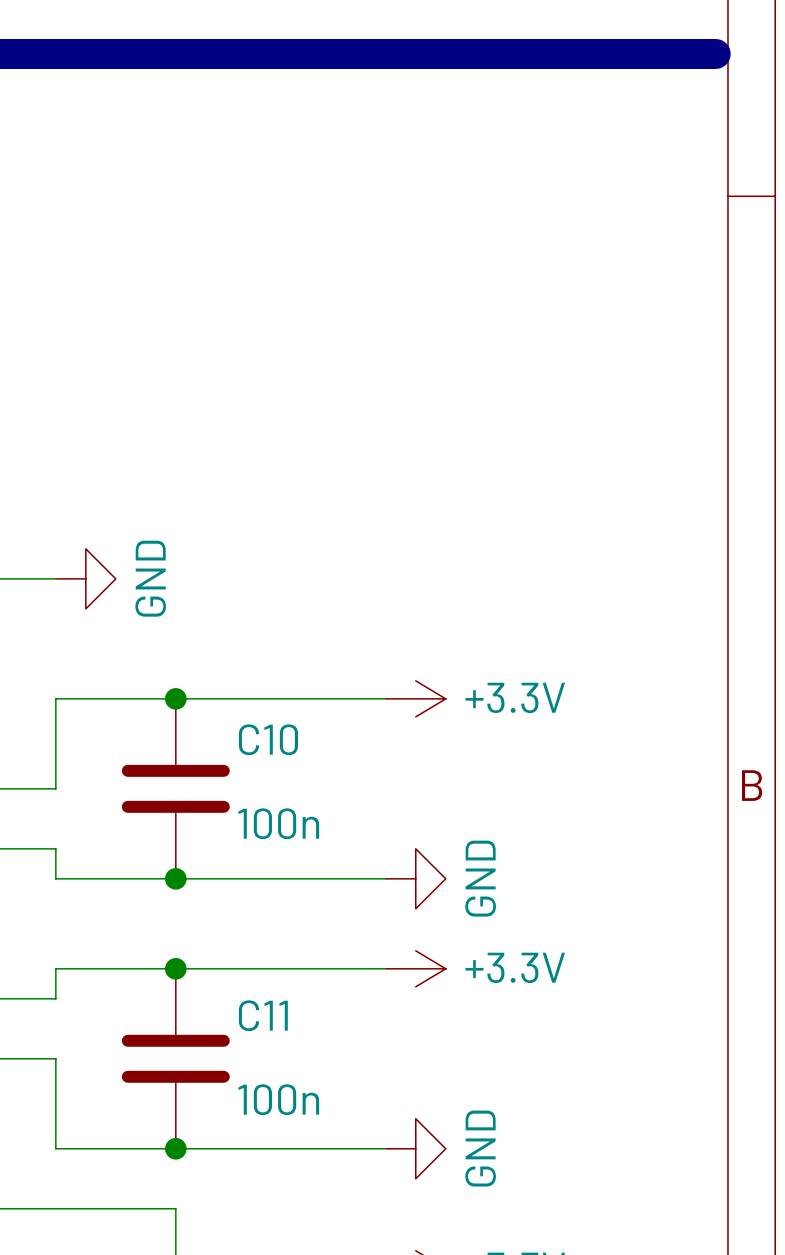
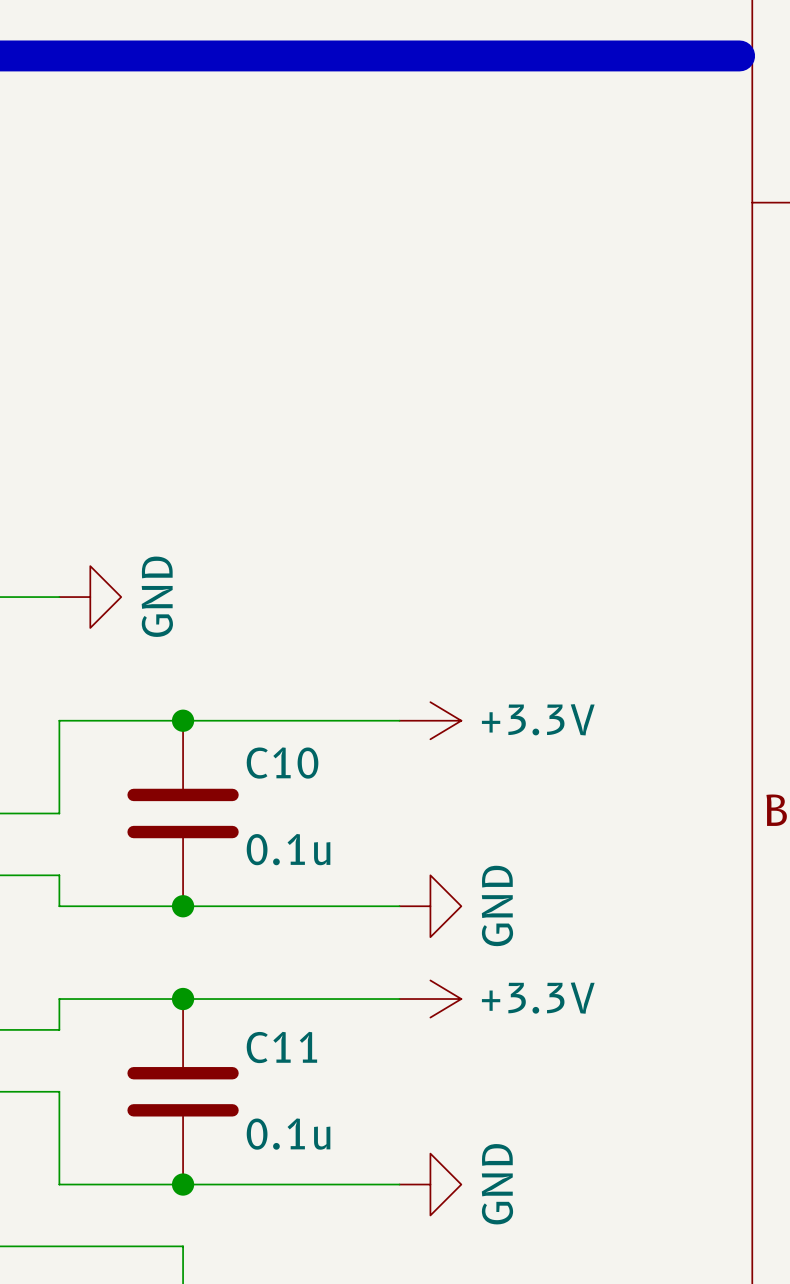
C10 value: 100n (278, 823) -> 0.1u (288, 849)
C11 value: 100n (278, 1099) -> 0.1u (288, 1134)

